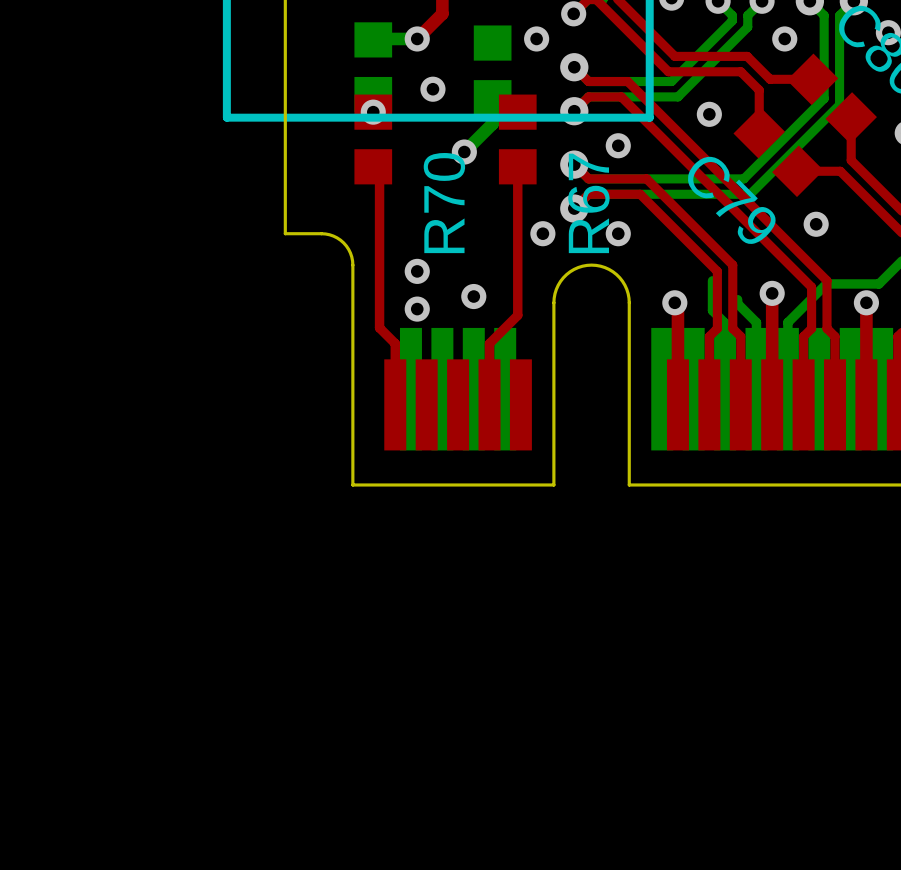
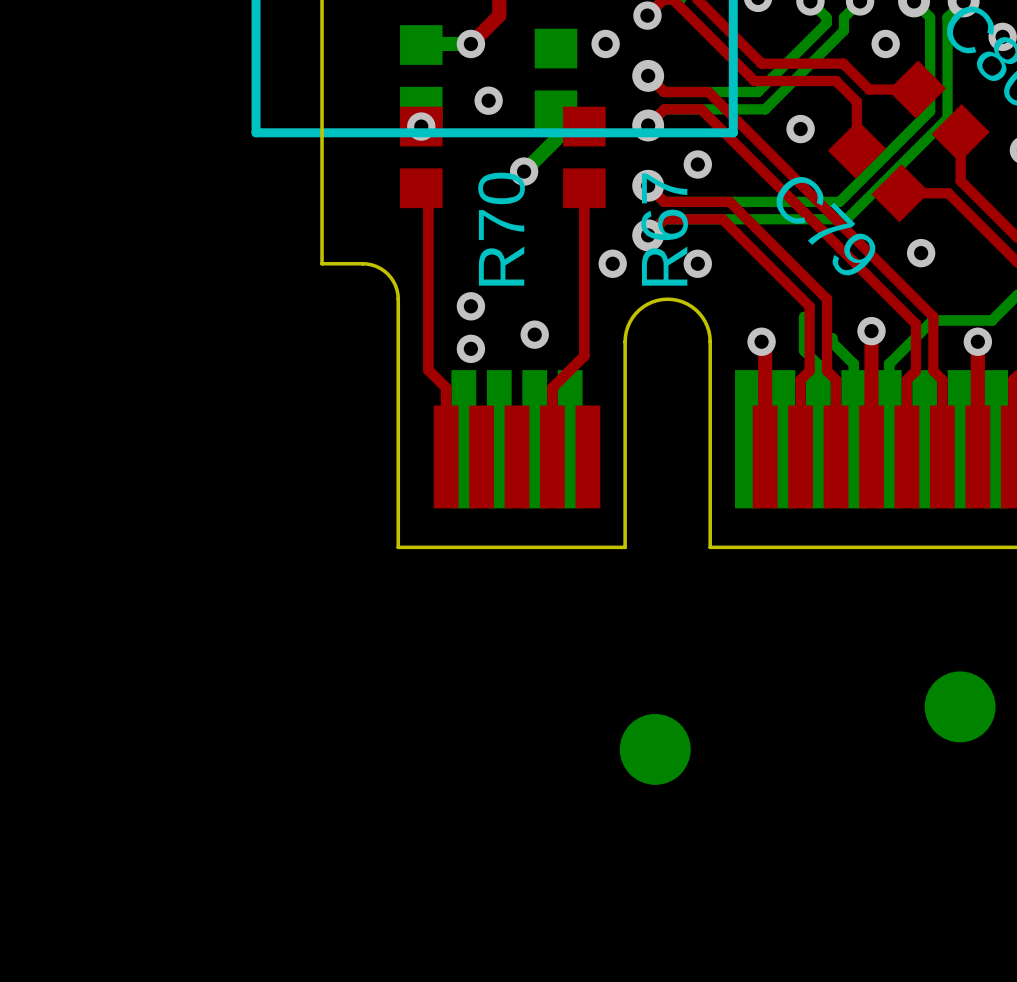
part: none -> (960, 706)
part: none -> (655, 749)

